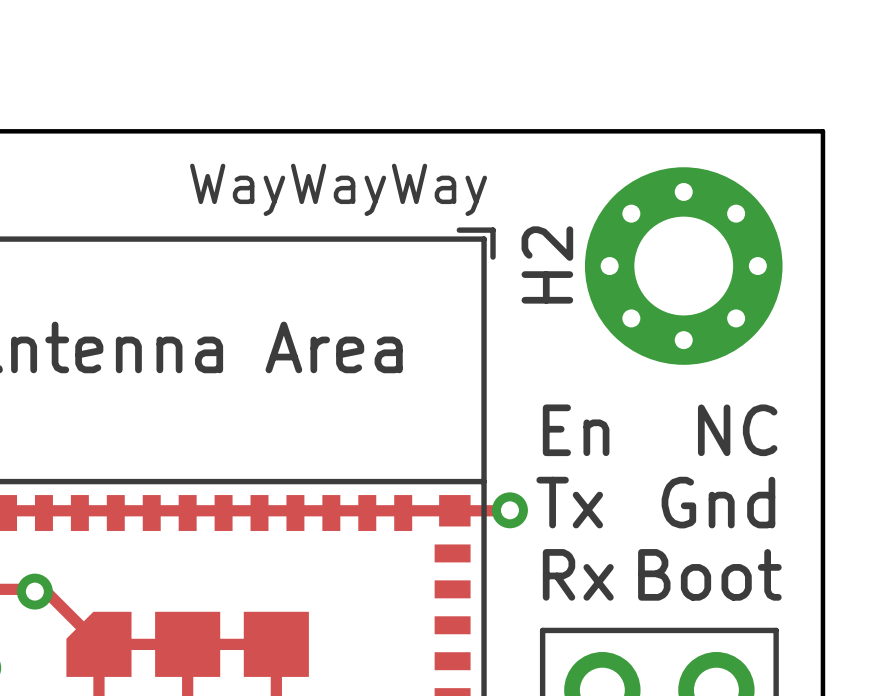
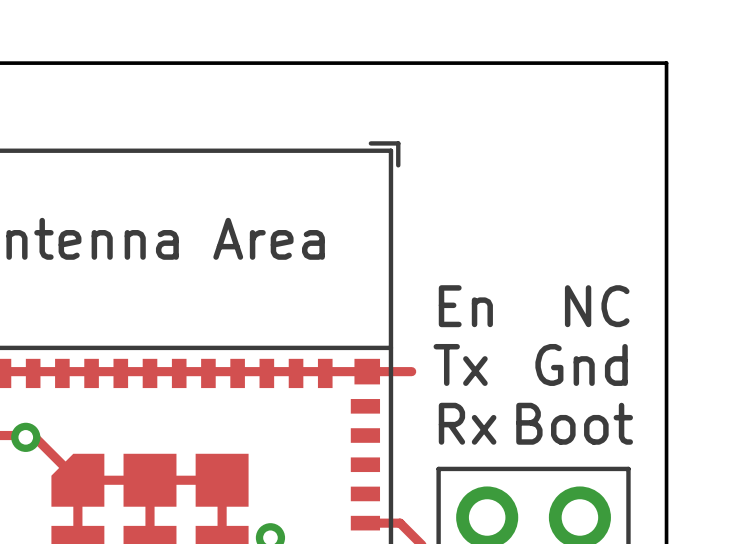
text: WayWayWay (338, 189) -> none
H2: (683, 266) -> none
via: (509, 510) -> none

